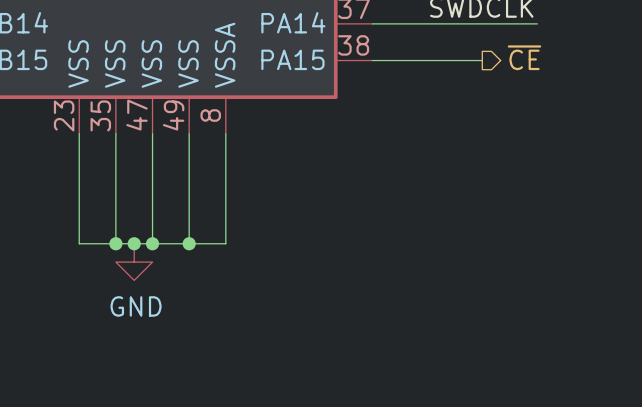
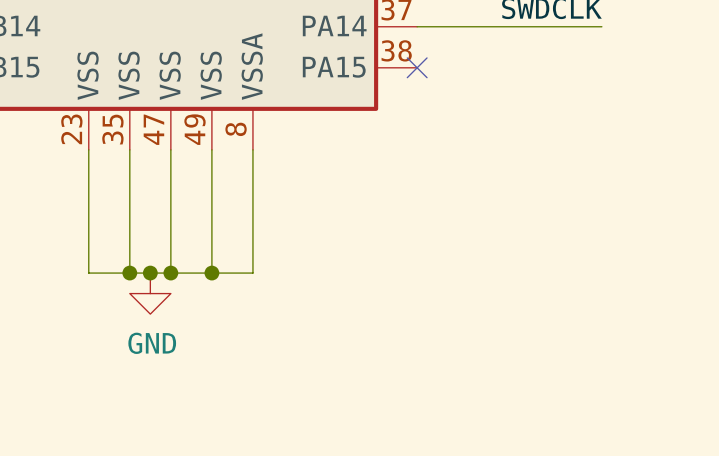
hierarchical label: ~{CE} (524, 57) -> none
wire: (372, 60) (482, 60) -> none
no-connect mark: none -> (417, 67)

